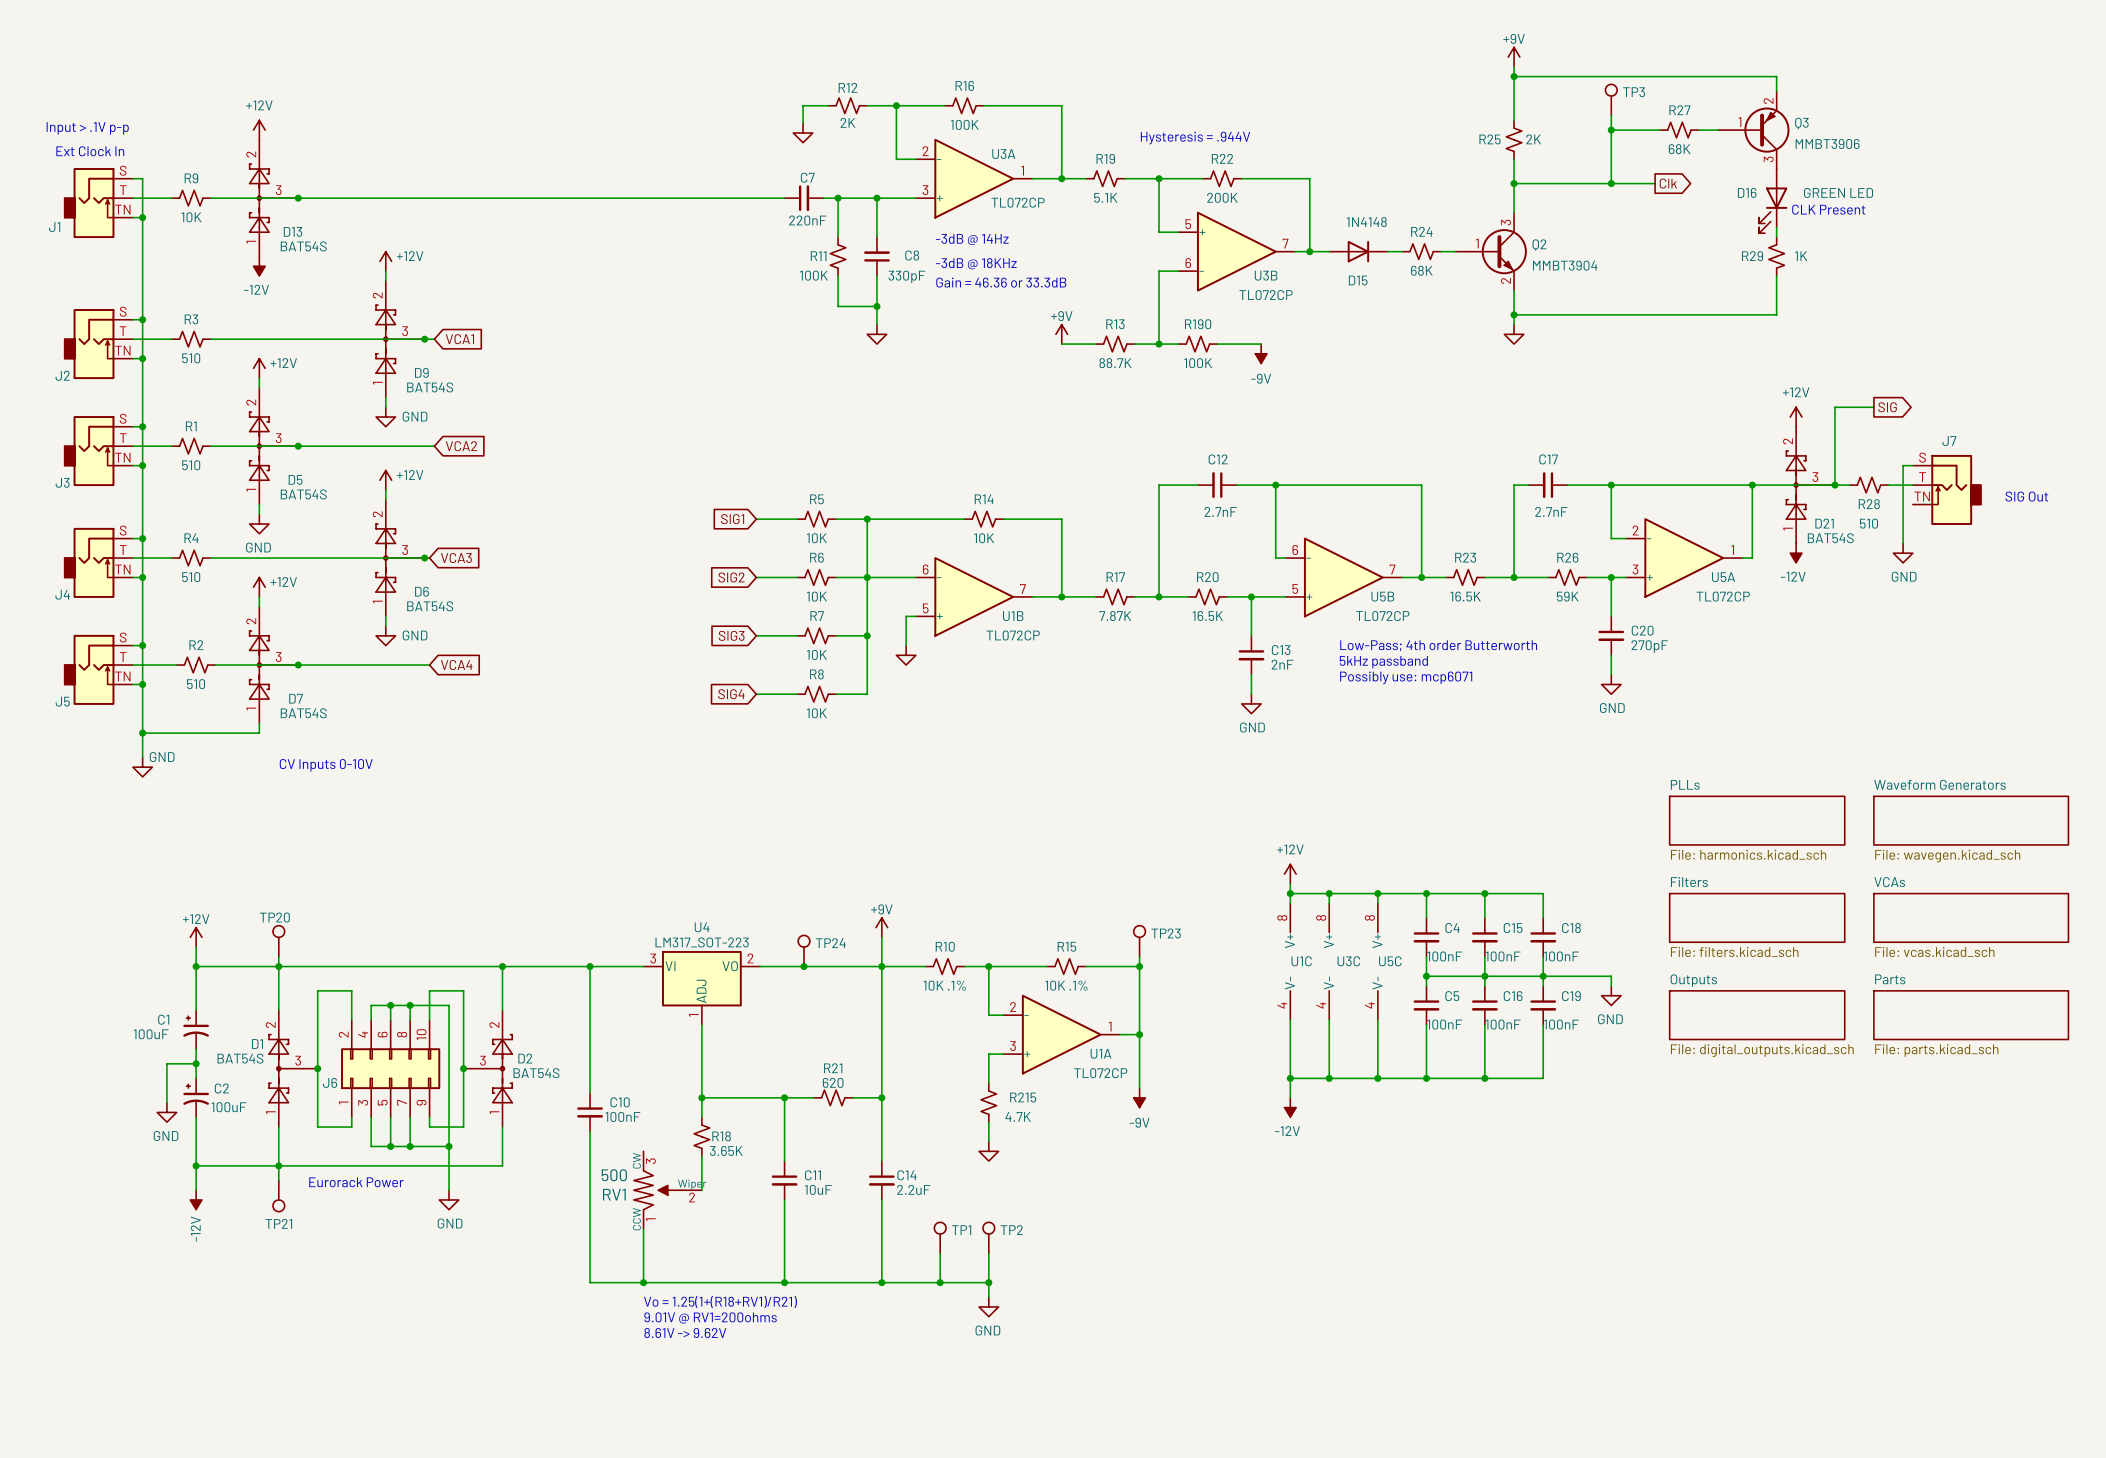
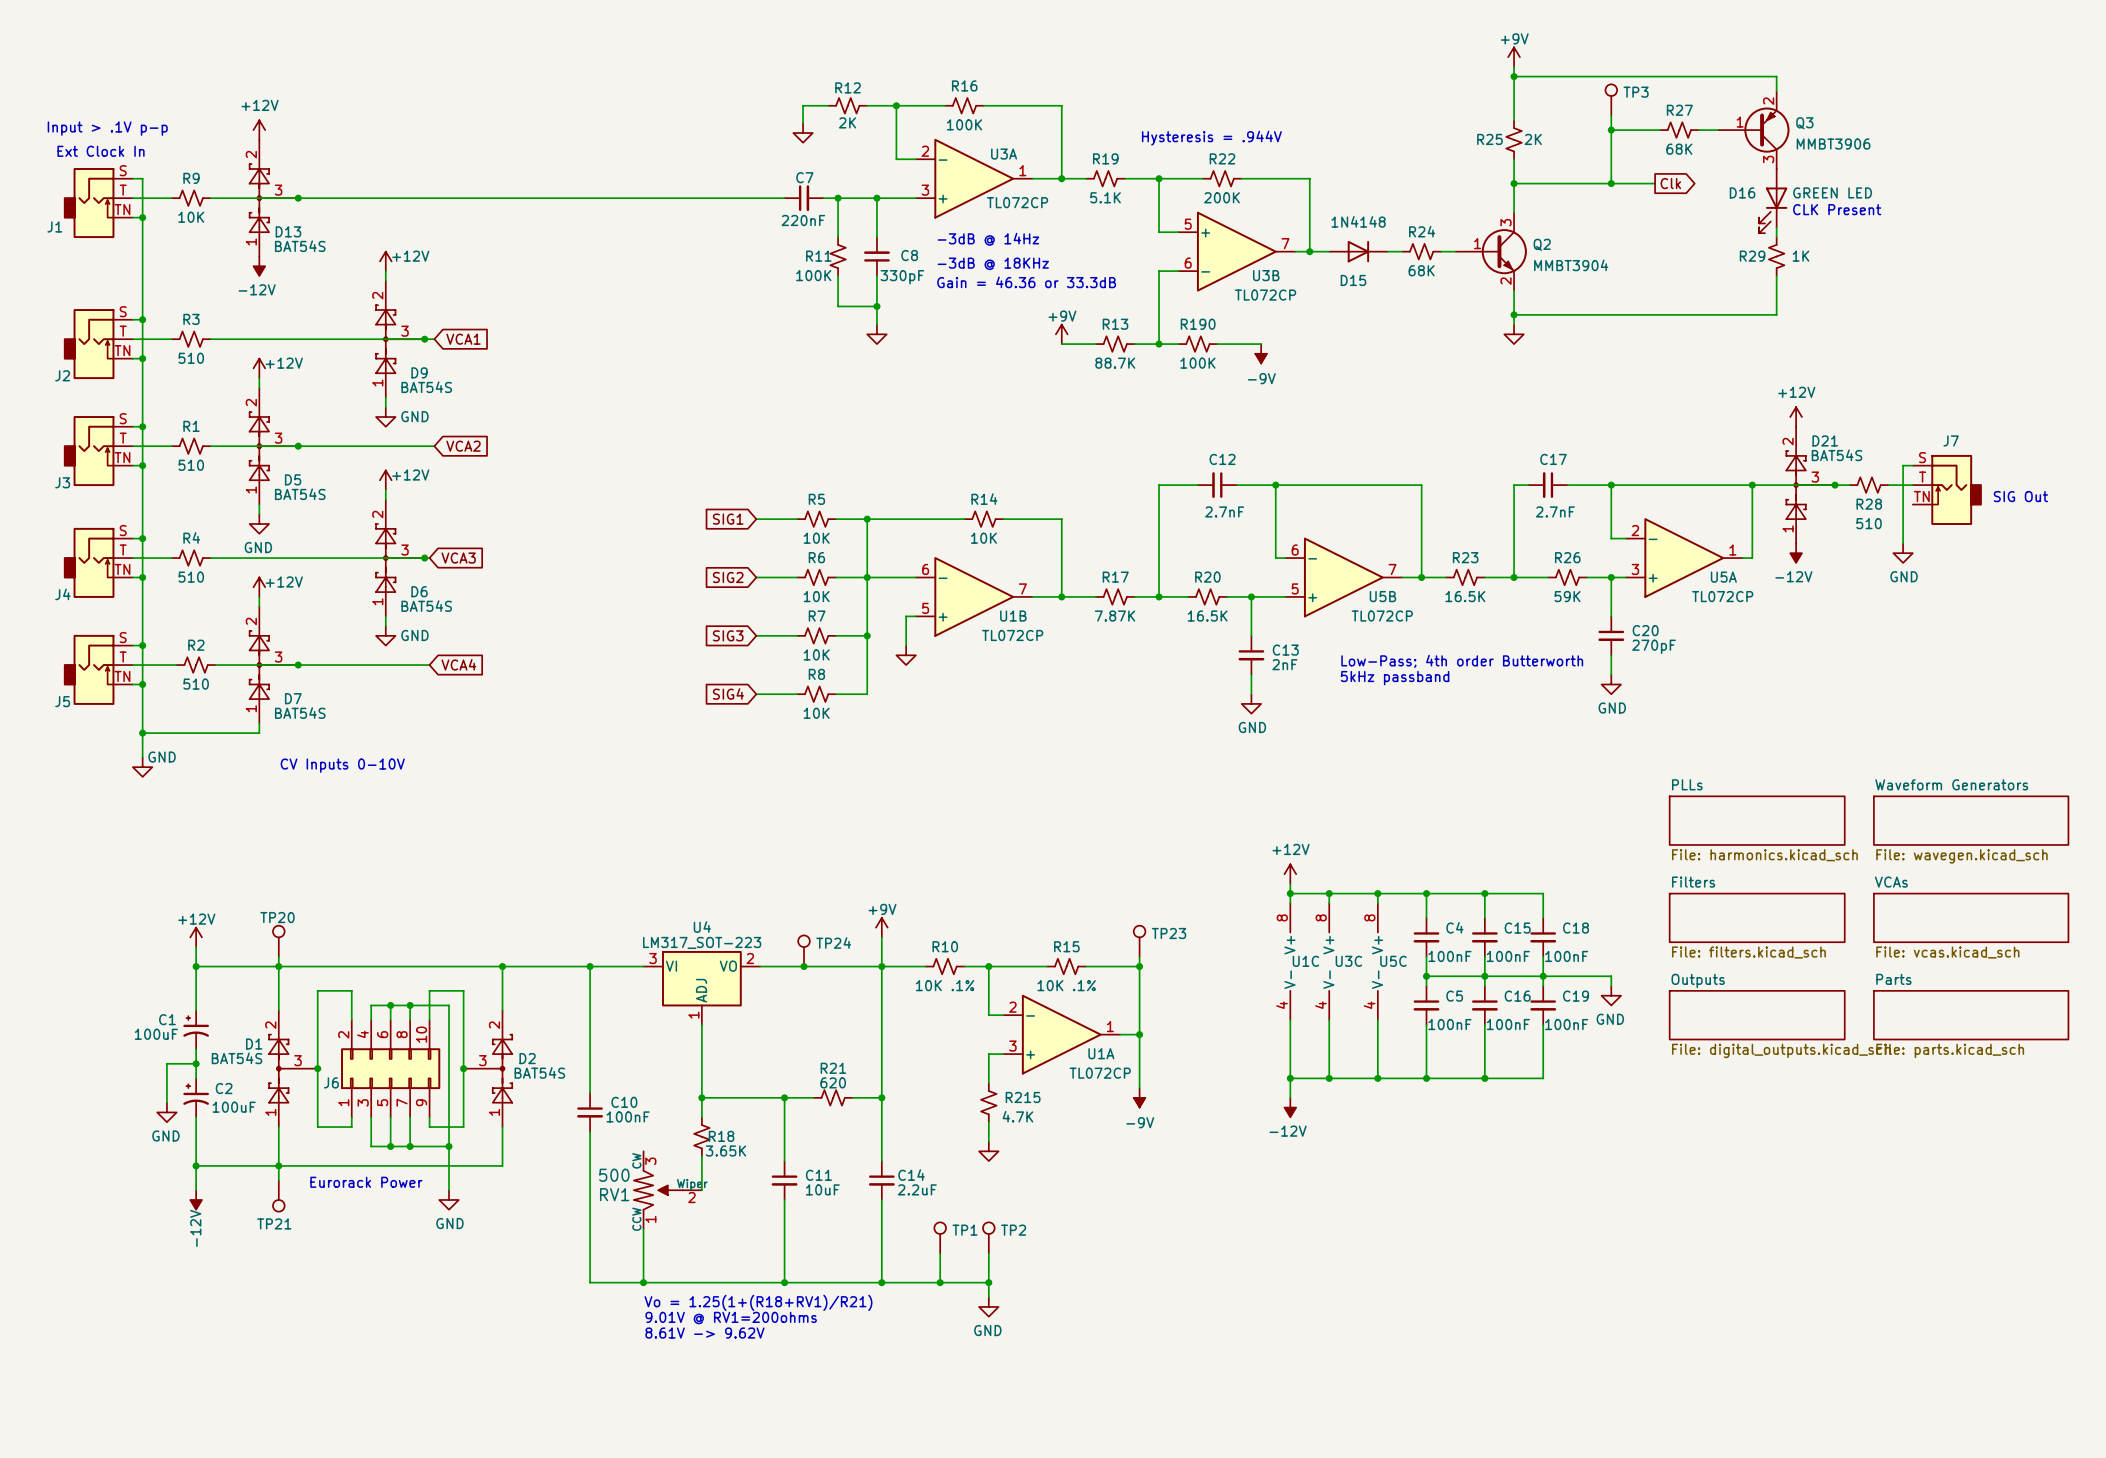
wire: (1873, 407) (1835, 407) (1835, 485) -> none
global label: SIG (1887, 407) -> none
D21 name position: D21 (1824, 523) -> D21 (1825, 440)
D21 value position: BAT54S (1830, 538) -> BAT54S (1837, 455)
text: Low-Pass; 4th order Butterworth (1438, 645) -> none
text: 5kHz passband (1383, 662) -> Low-Pass; 4th order Butterworth (1462, 661)
text: Possibly use: mcp6071 (1406, 677) -> 5kHz passband (1395, 678)

